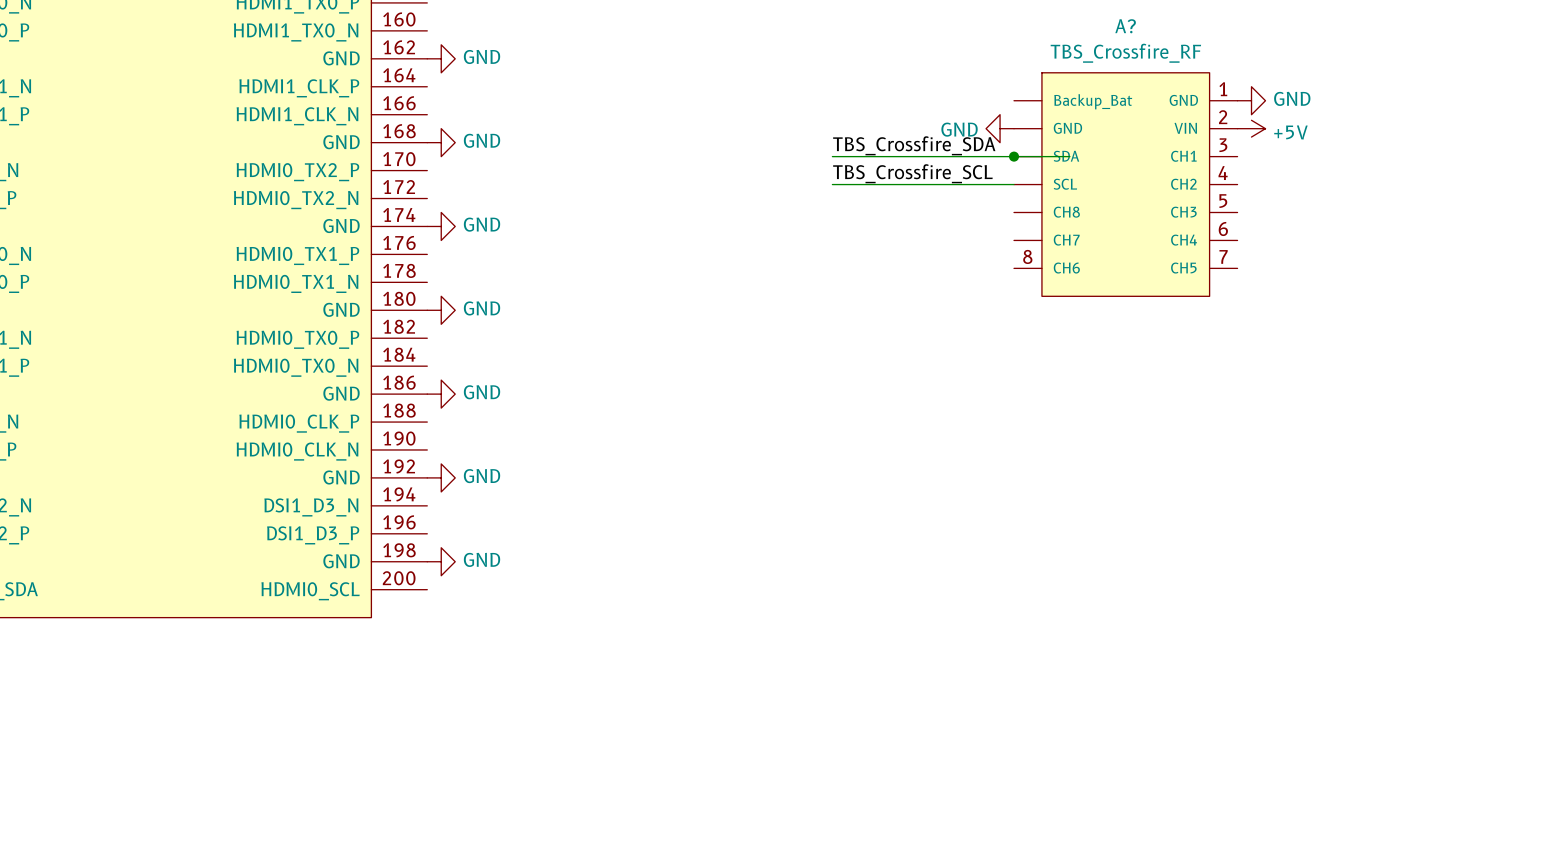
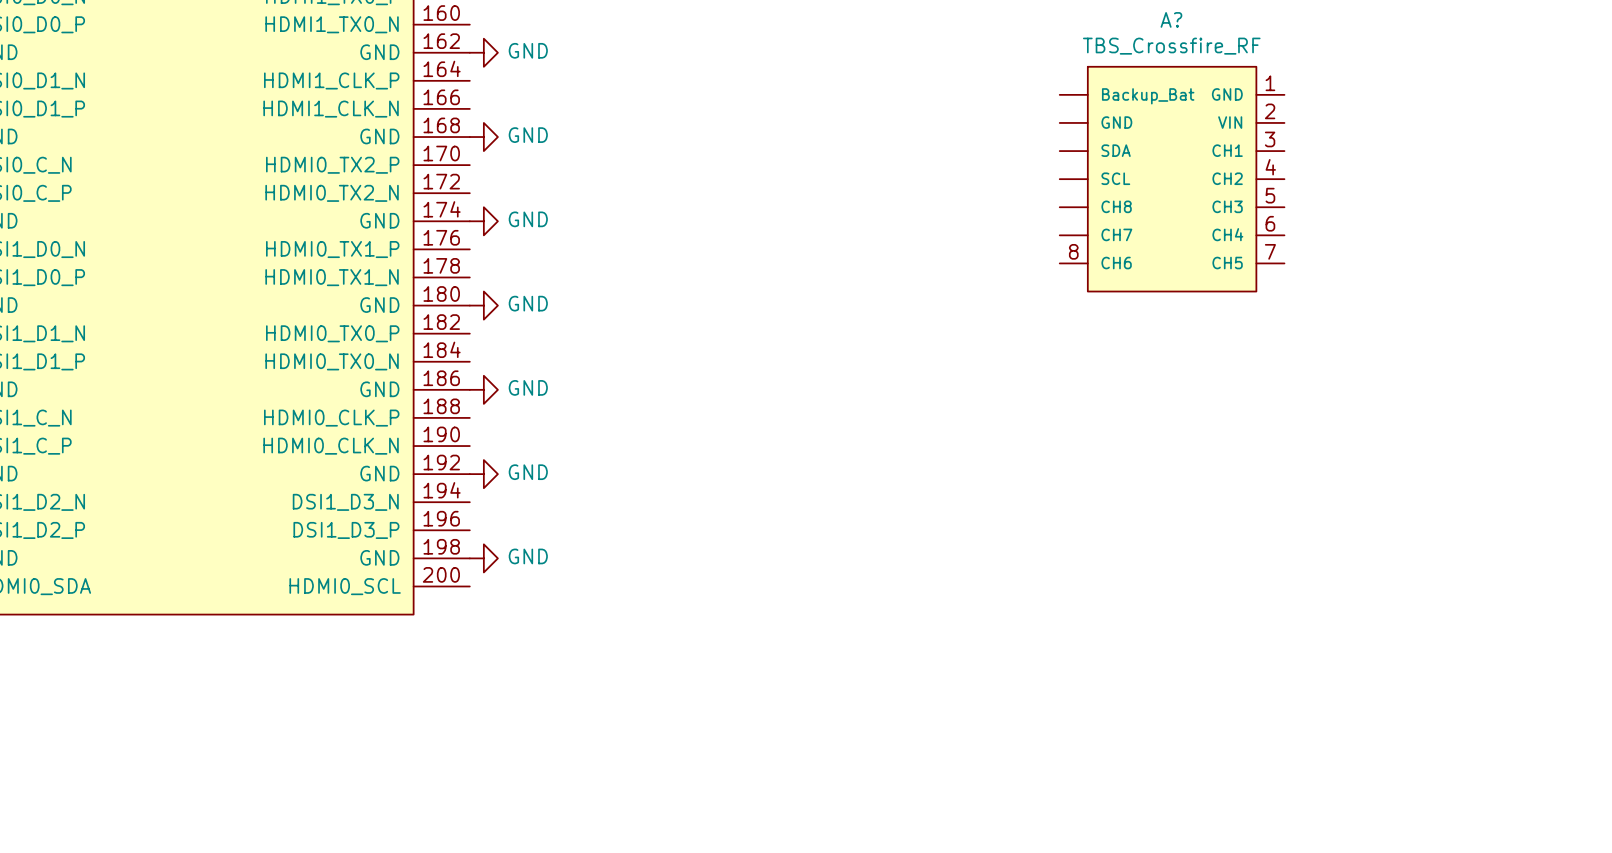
power symbol: GND (1251, 100) -> none
power symbol: GND (1000, 128) -> none
power symbol: +5V (1251, 128) -> none
label: TBS_Crossfire_SDA (914, 145) -> none
wire: (832, 156) (1069, 156) -> none
junction: (1014, 156) -> none
label: TBS_Crossfire_SCL (912, 173) -> none
wire: (832, 184) (1014, 184) -> none

